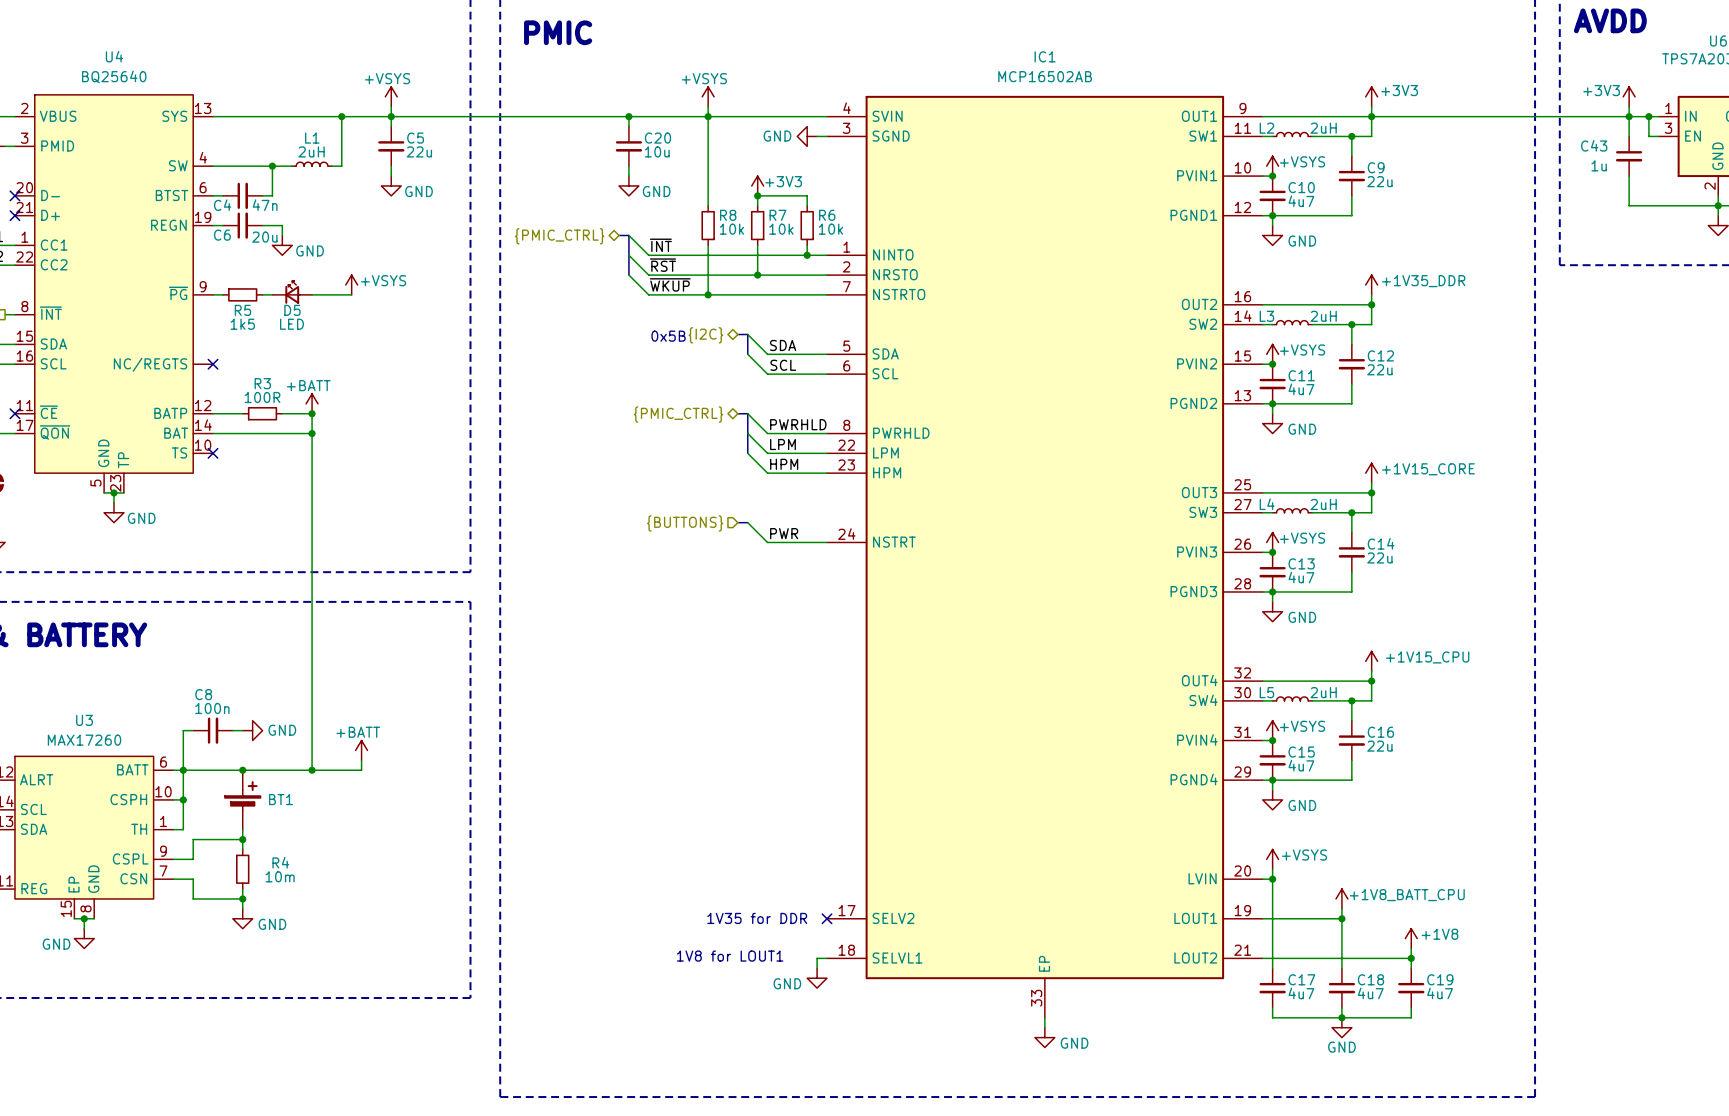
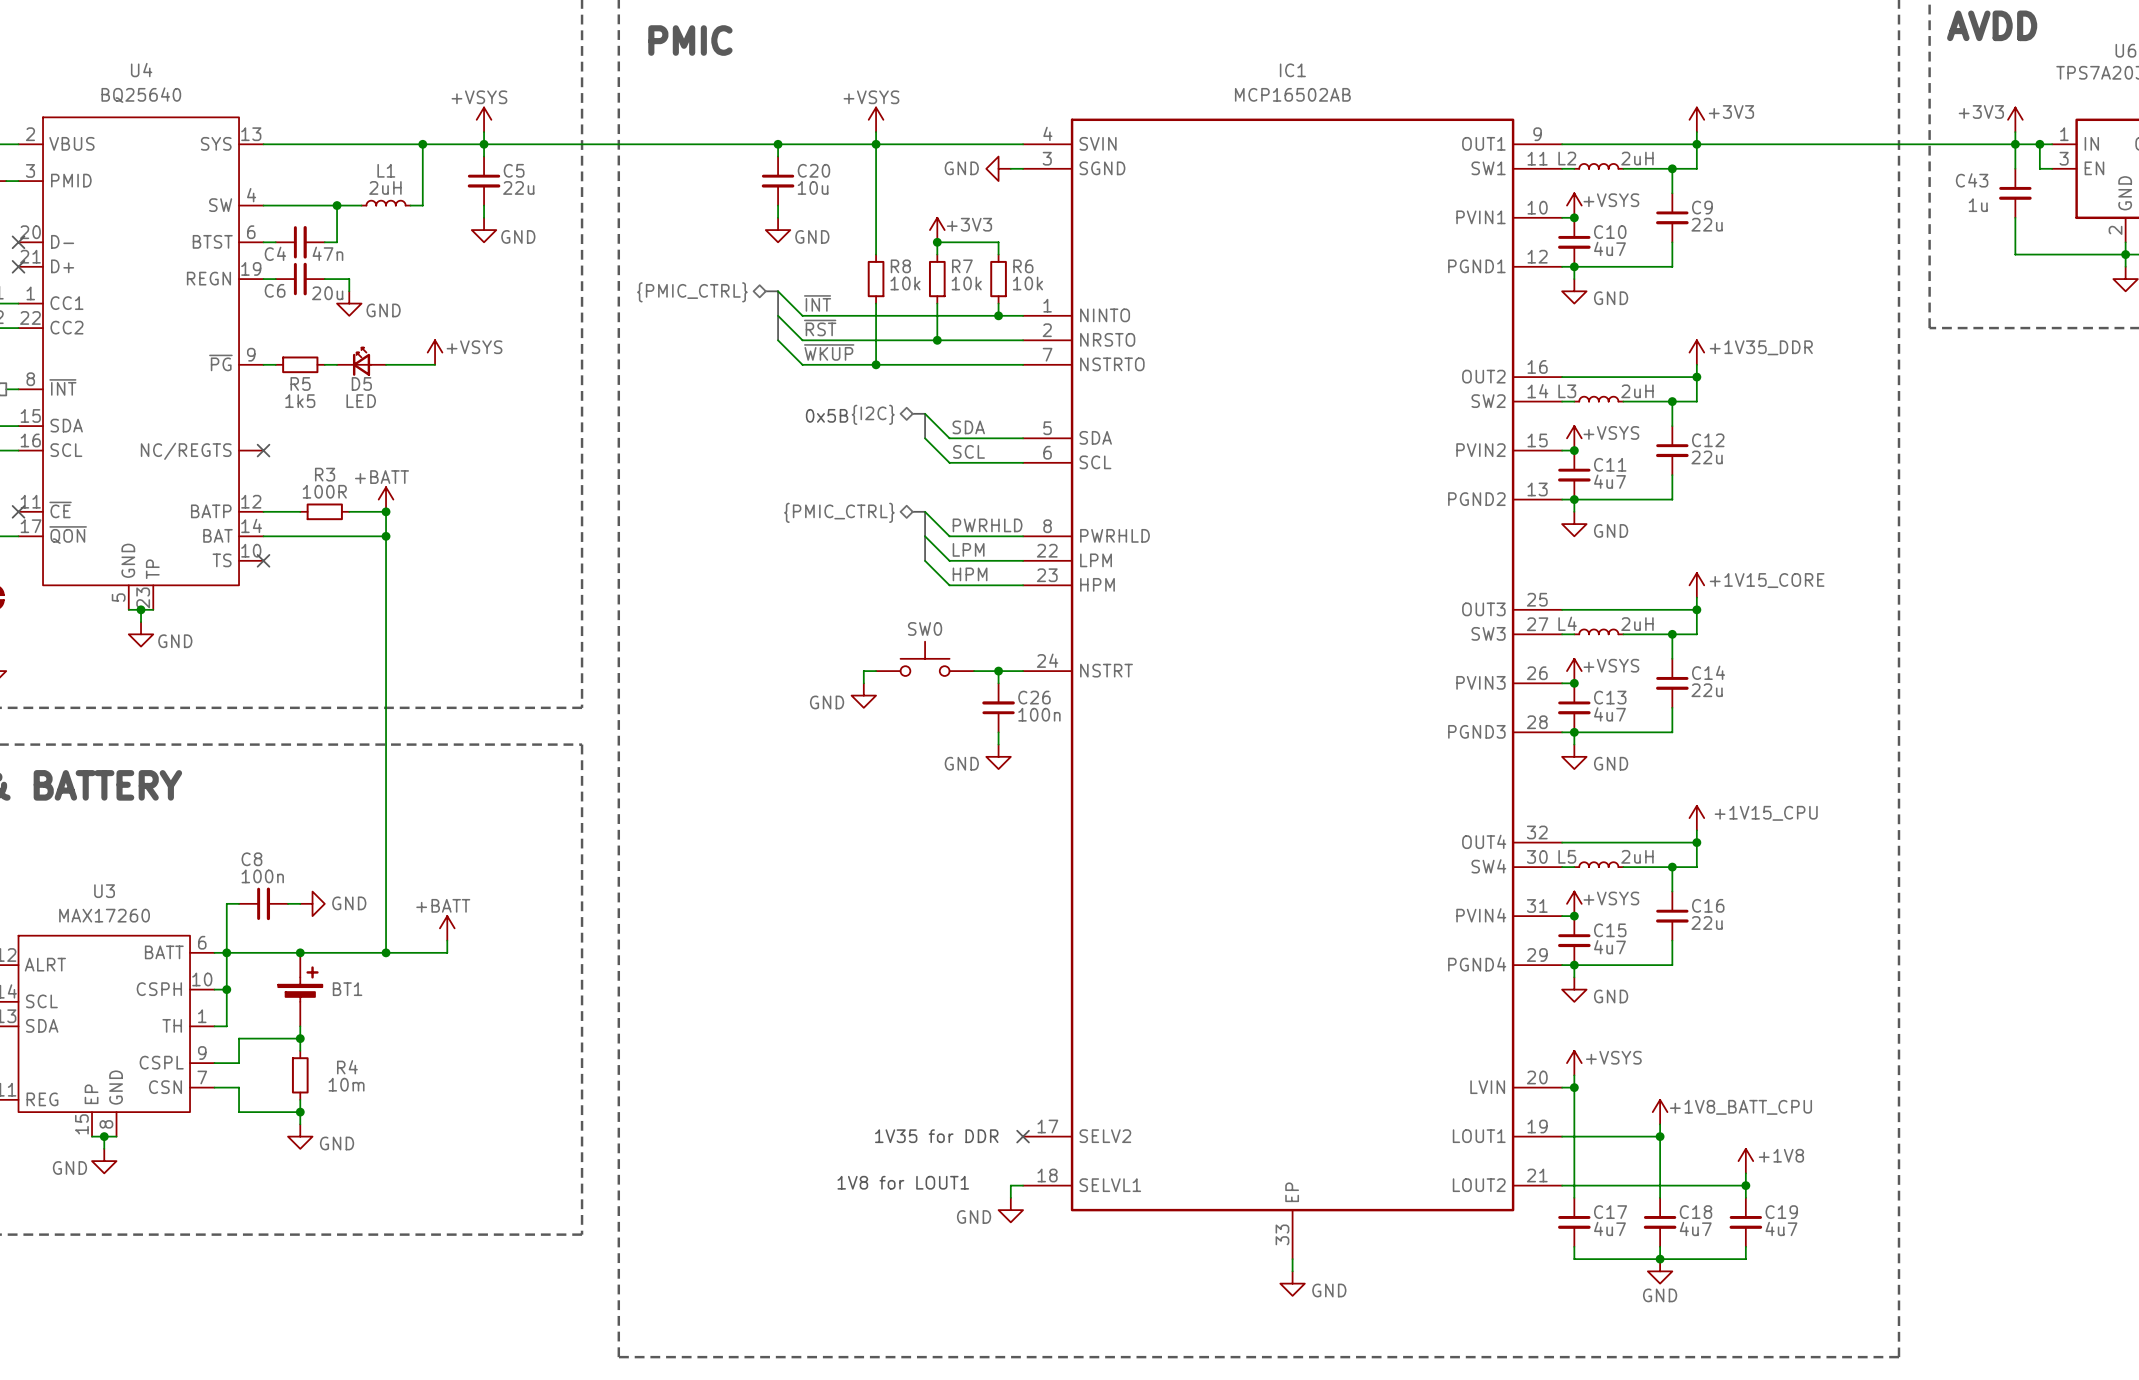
bus: (737, 522) (747, 522) -> none
wire: (747, 522) (767, 542) (787, 542) -> none
hierarchical label: {BUTTONS} (685, 523) -> none
SW0: none -> (925, 658)
label: PWR (784, 533) -> none
wire: none -> (876, 671) (863, 671) (863, 683)
wire: none -> (998, 671) (998, 683)
junction: none -> (998, 671)
power symbol: none -> GND (863, 695)
C26: none -> 100n (998, 707)
wire: none -> (998, 732) (998, 744)
power symbol: none -> GND (998, 756)

